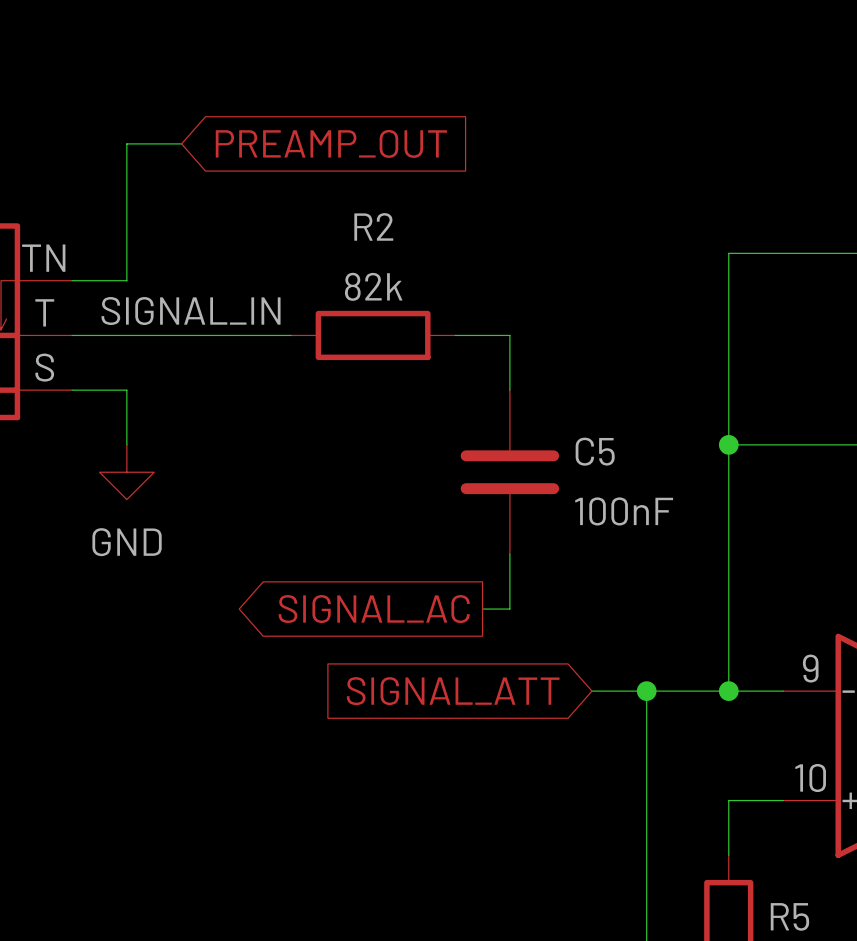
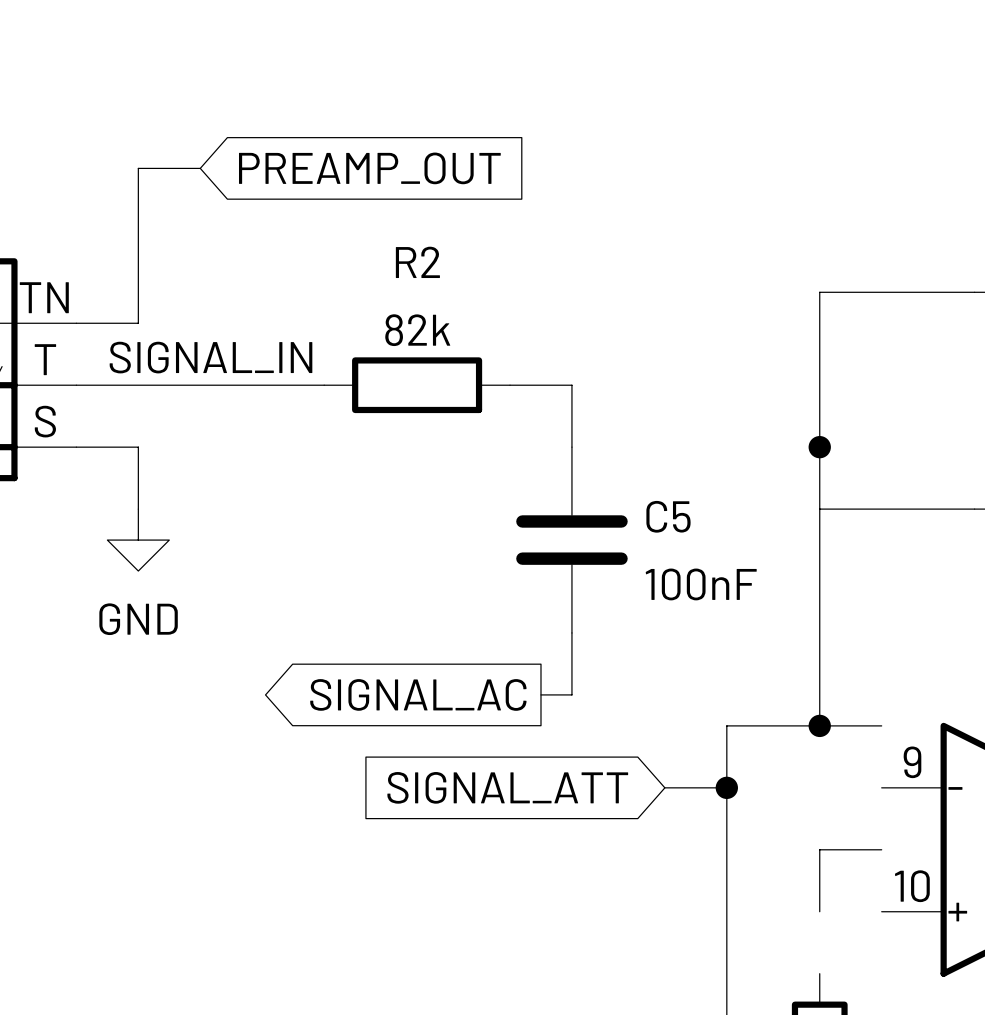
junction position: (728, 444) -> (819, 447)
wire: (728, 636) (728, 691) -> none
wire: (646, 691) (783, 691) -> (726, 787) (726, 725) (881, 725)
junction position: (728, 691) -> (819, 725)
wire: (783, 800) (728, 800) (728, 855) -> (881, 849) (819, 849) (819, 911)

